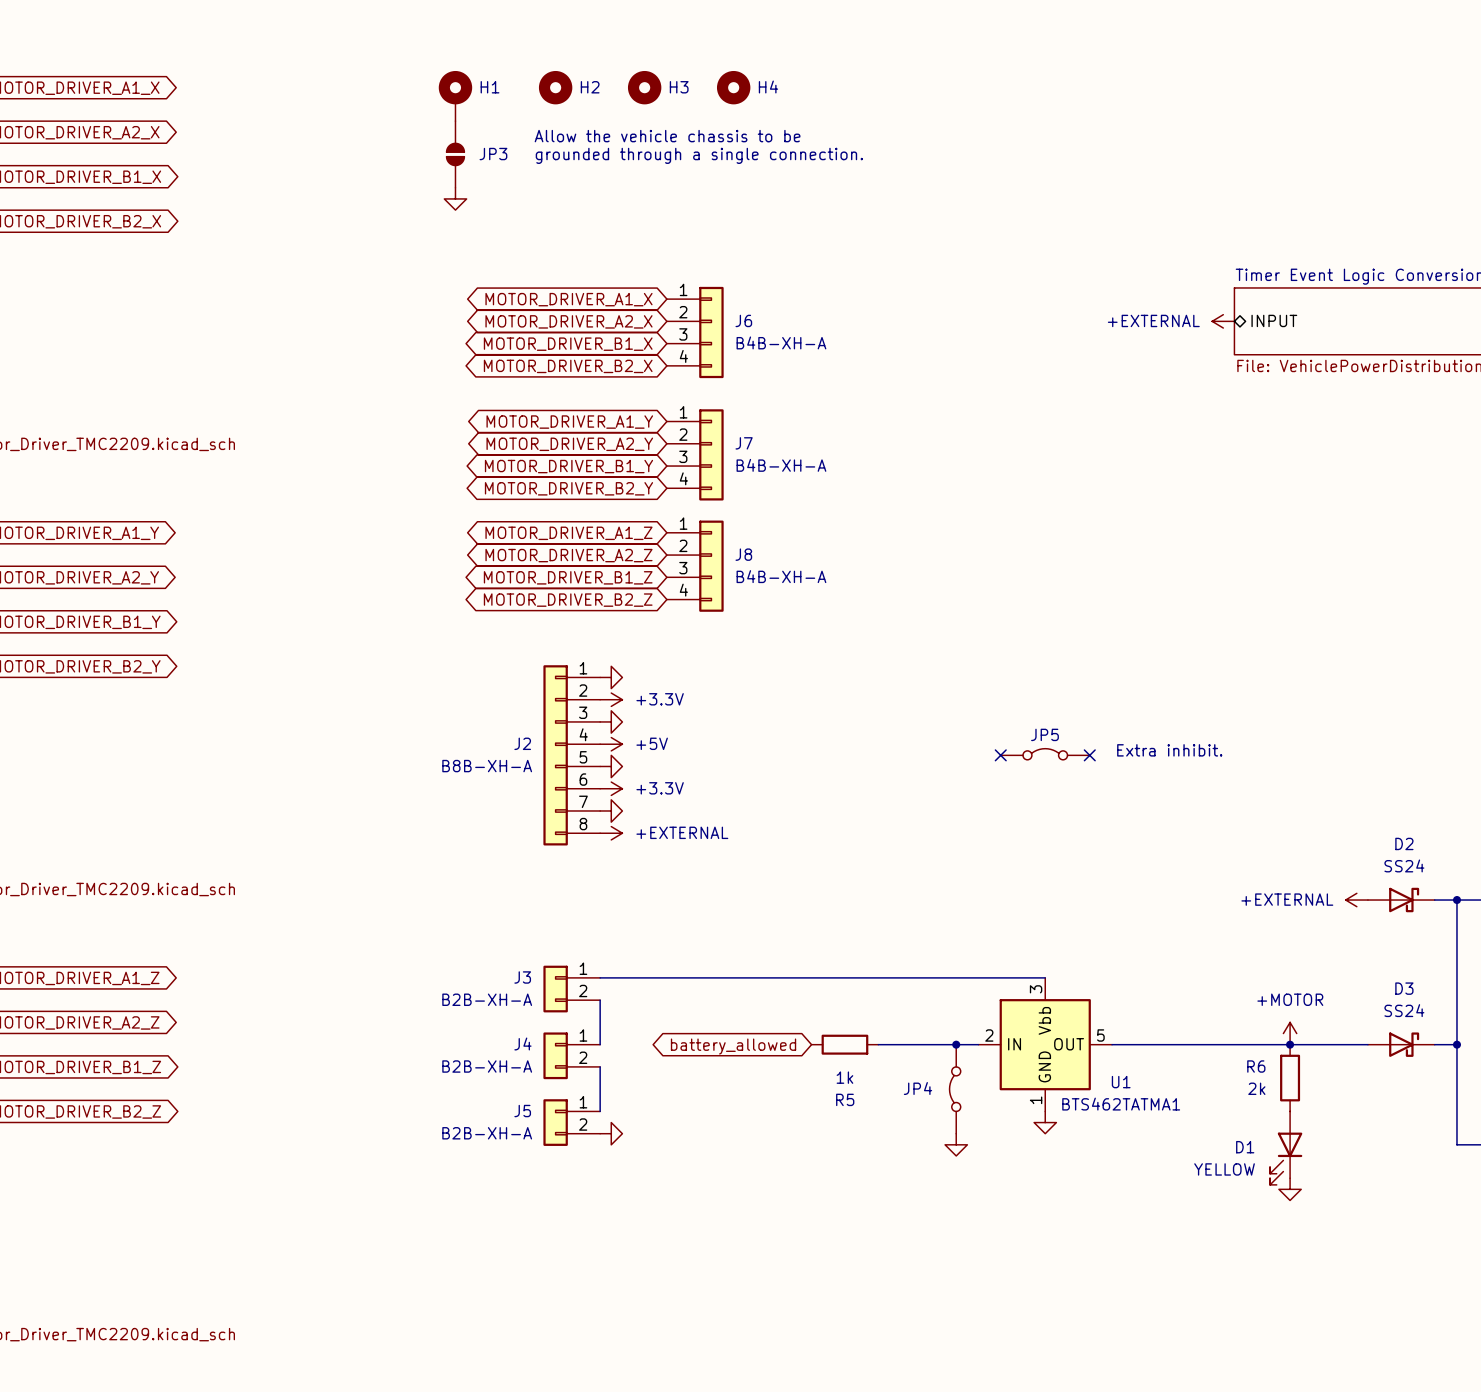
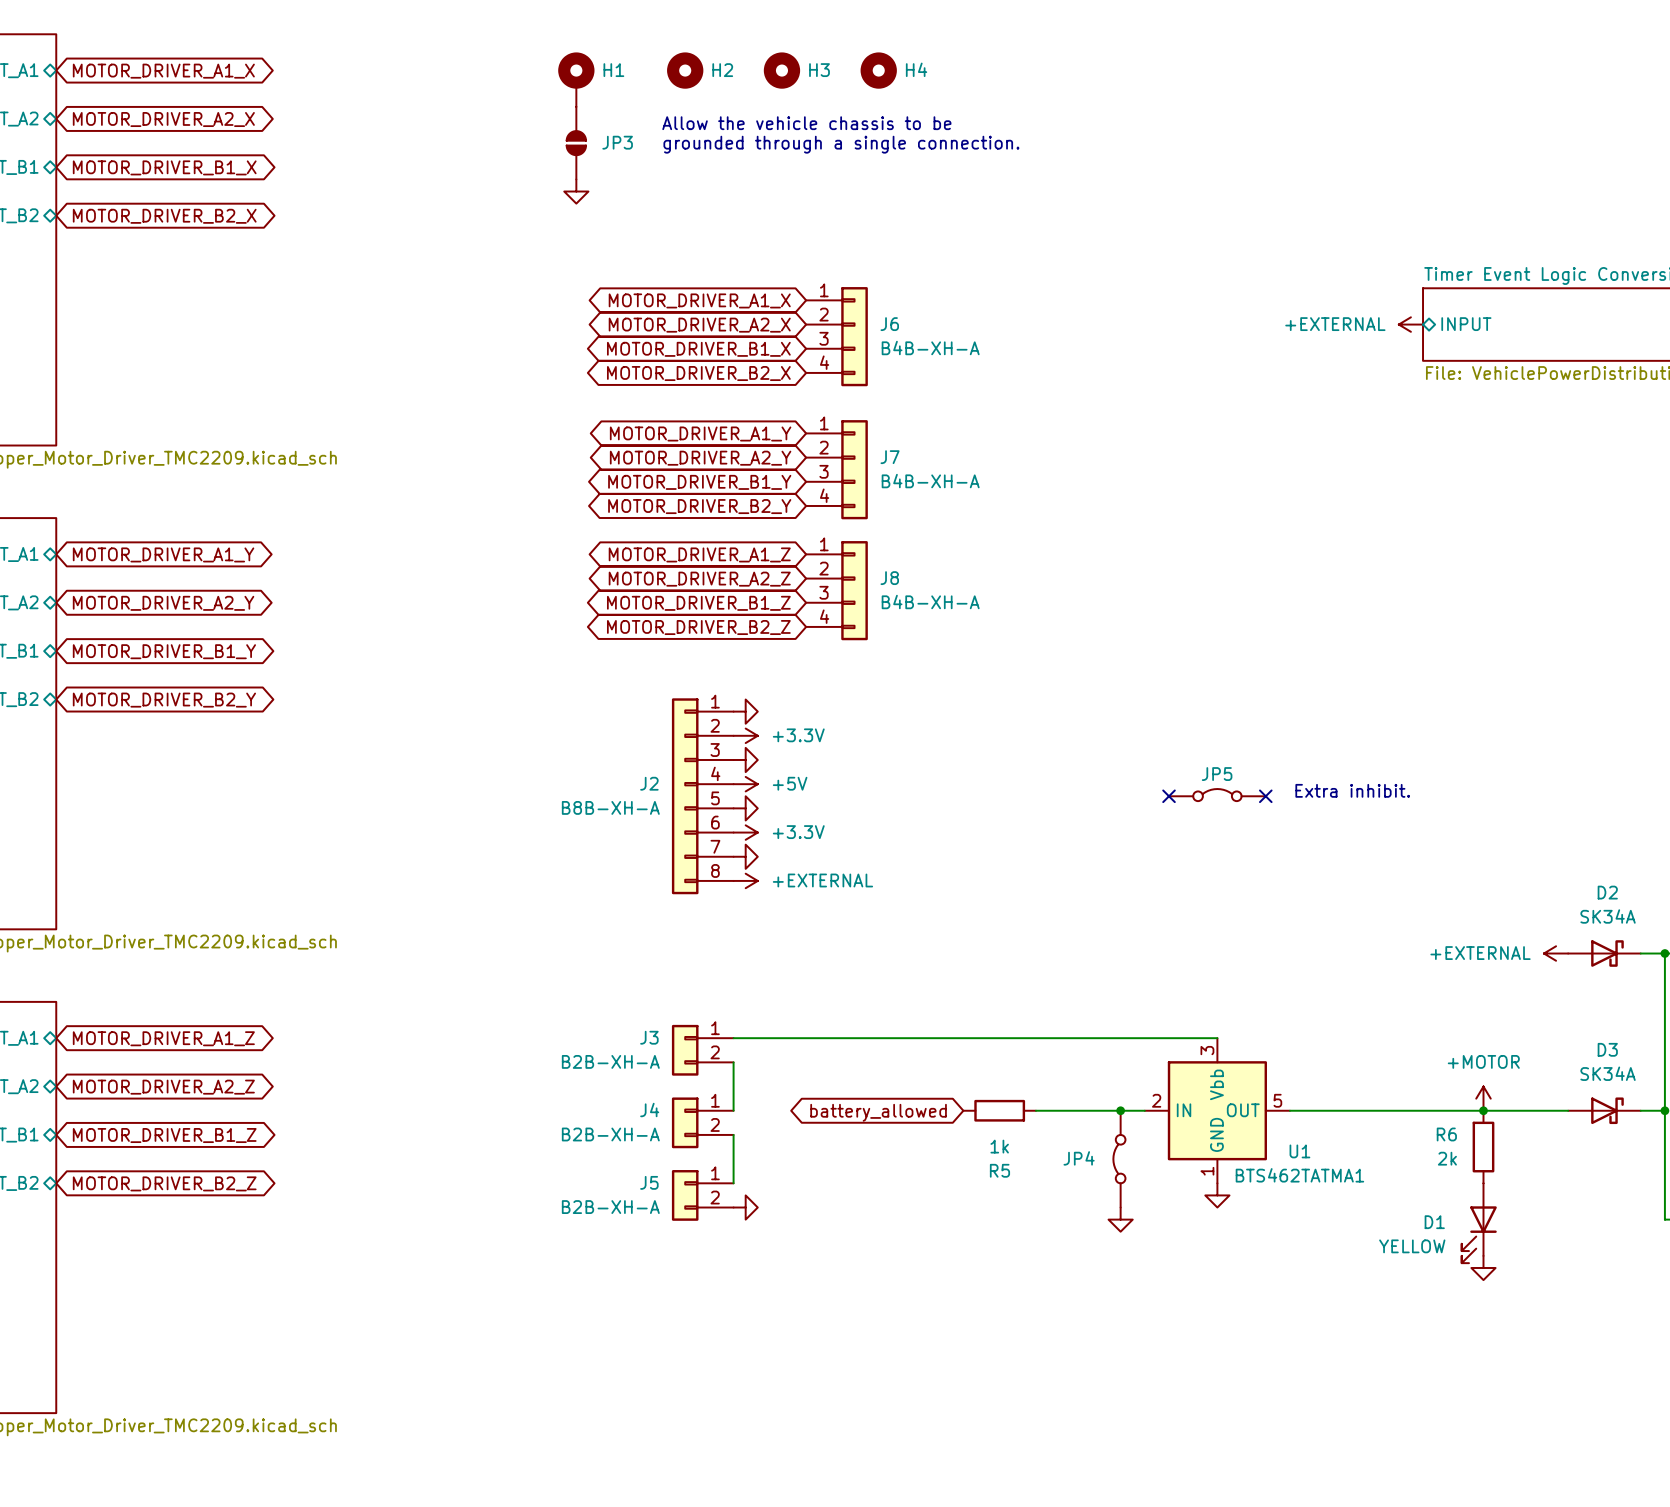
D2 value: SS24 (1404, 865) -> SK34A (1608, 916)
D3 value: SS24 (1404, 1010) -> SK34A (1608, 1073)

